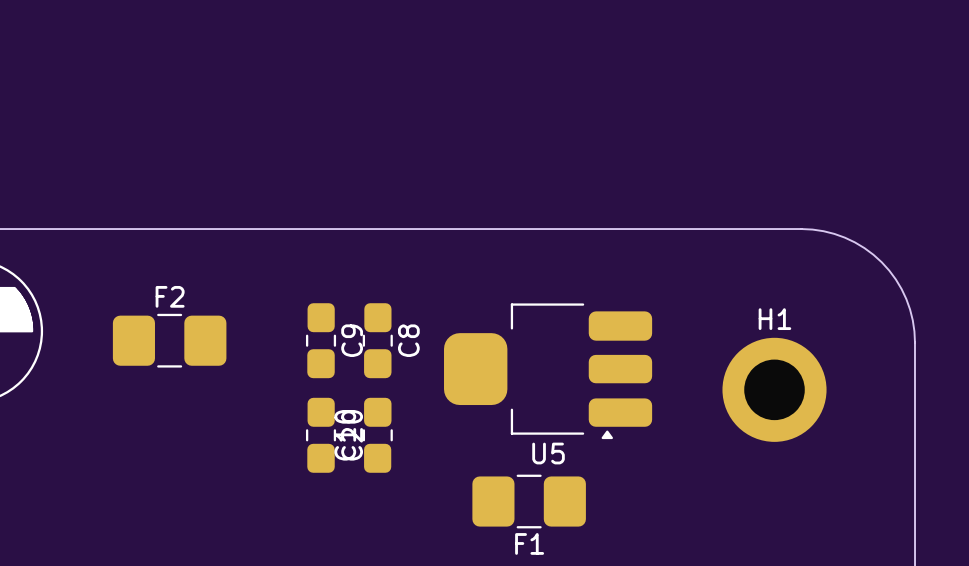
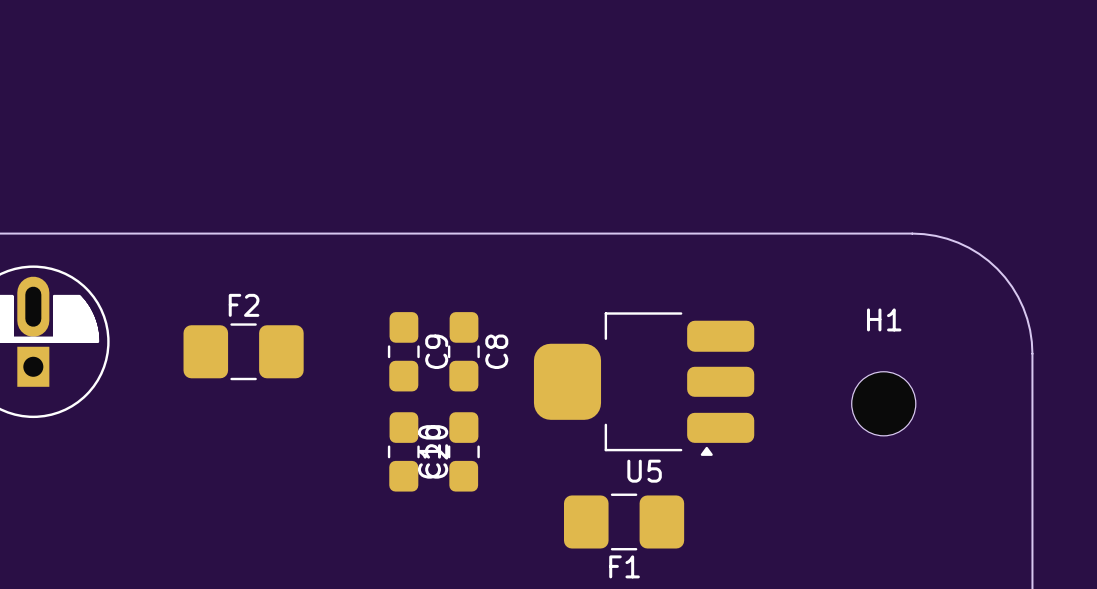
H1 footprint: [722, 337, 827, 442] -> [851, 371, 916, 436]

